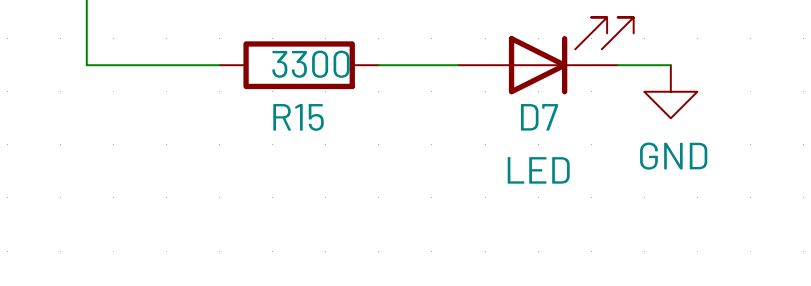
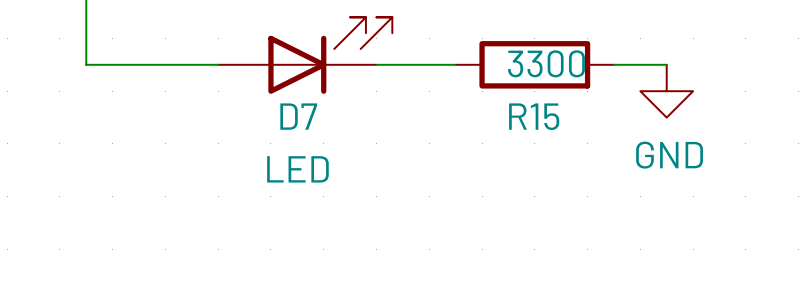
D7 position: (546, 55) -> (305, 55)
R15 position: (299, 65) -> (534, 64)

